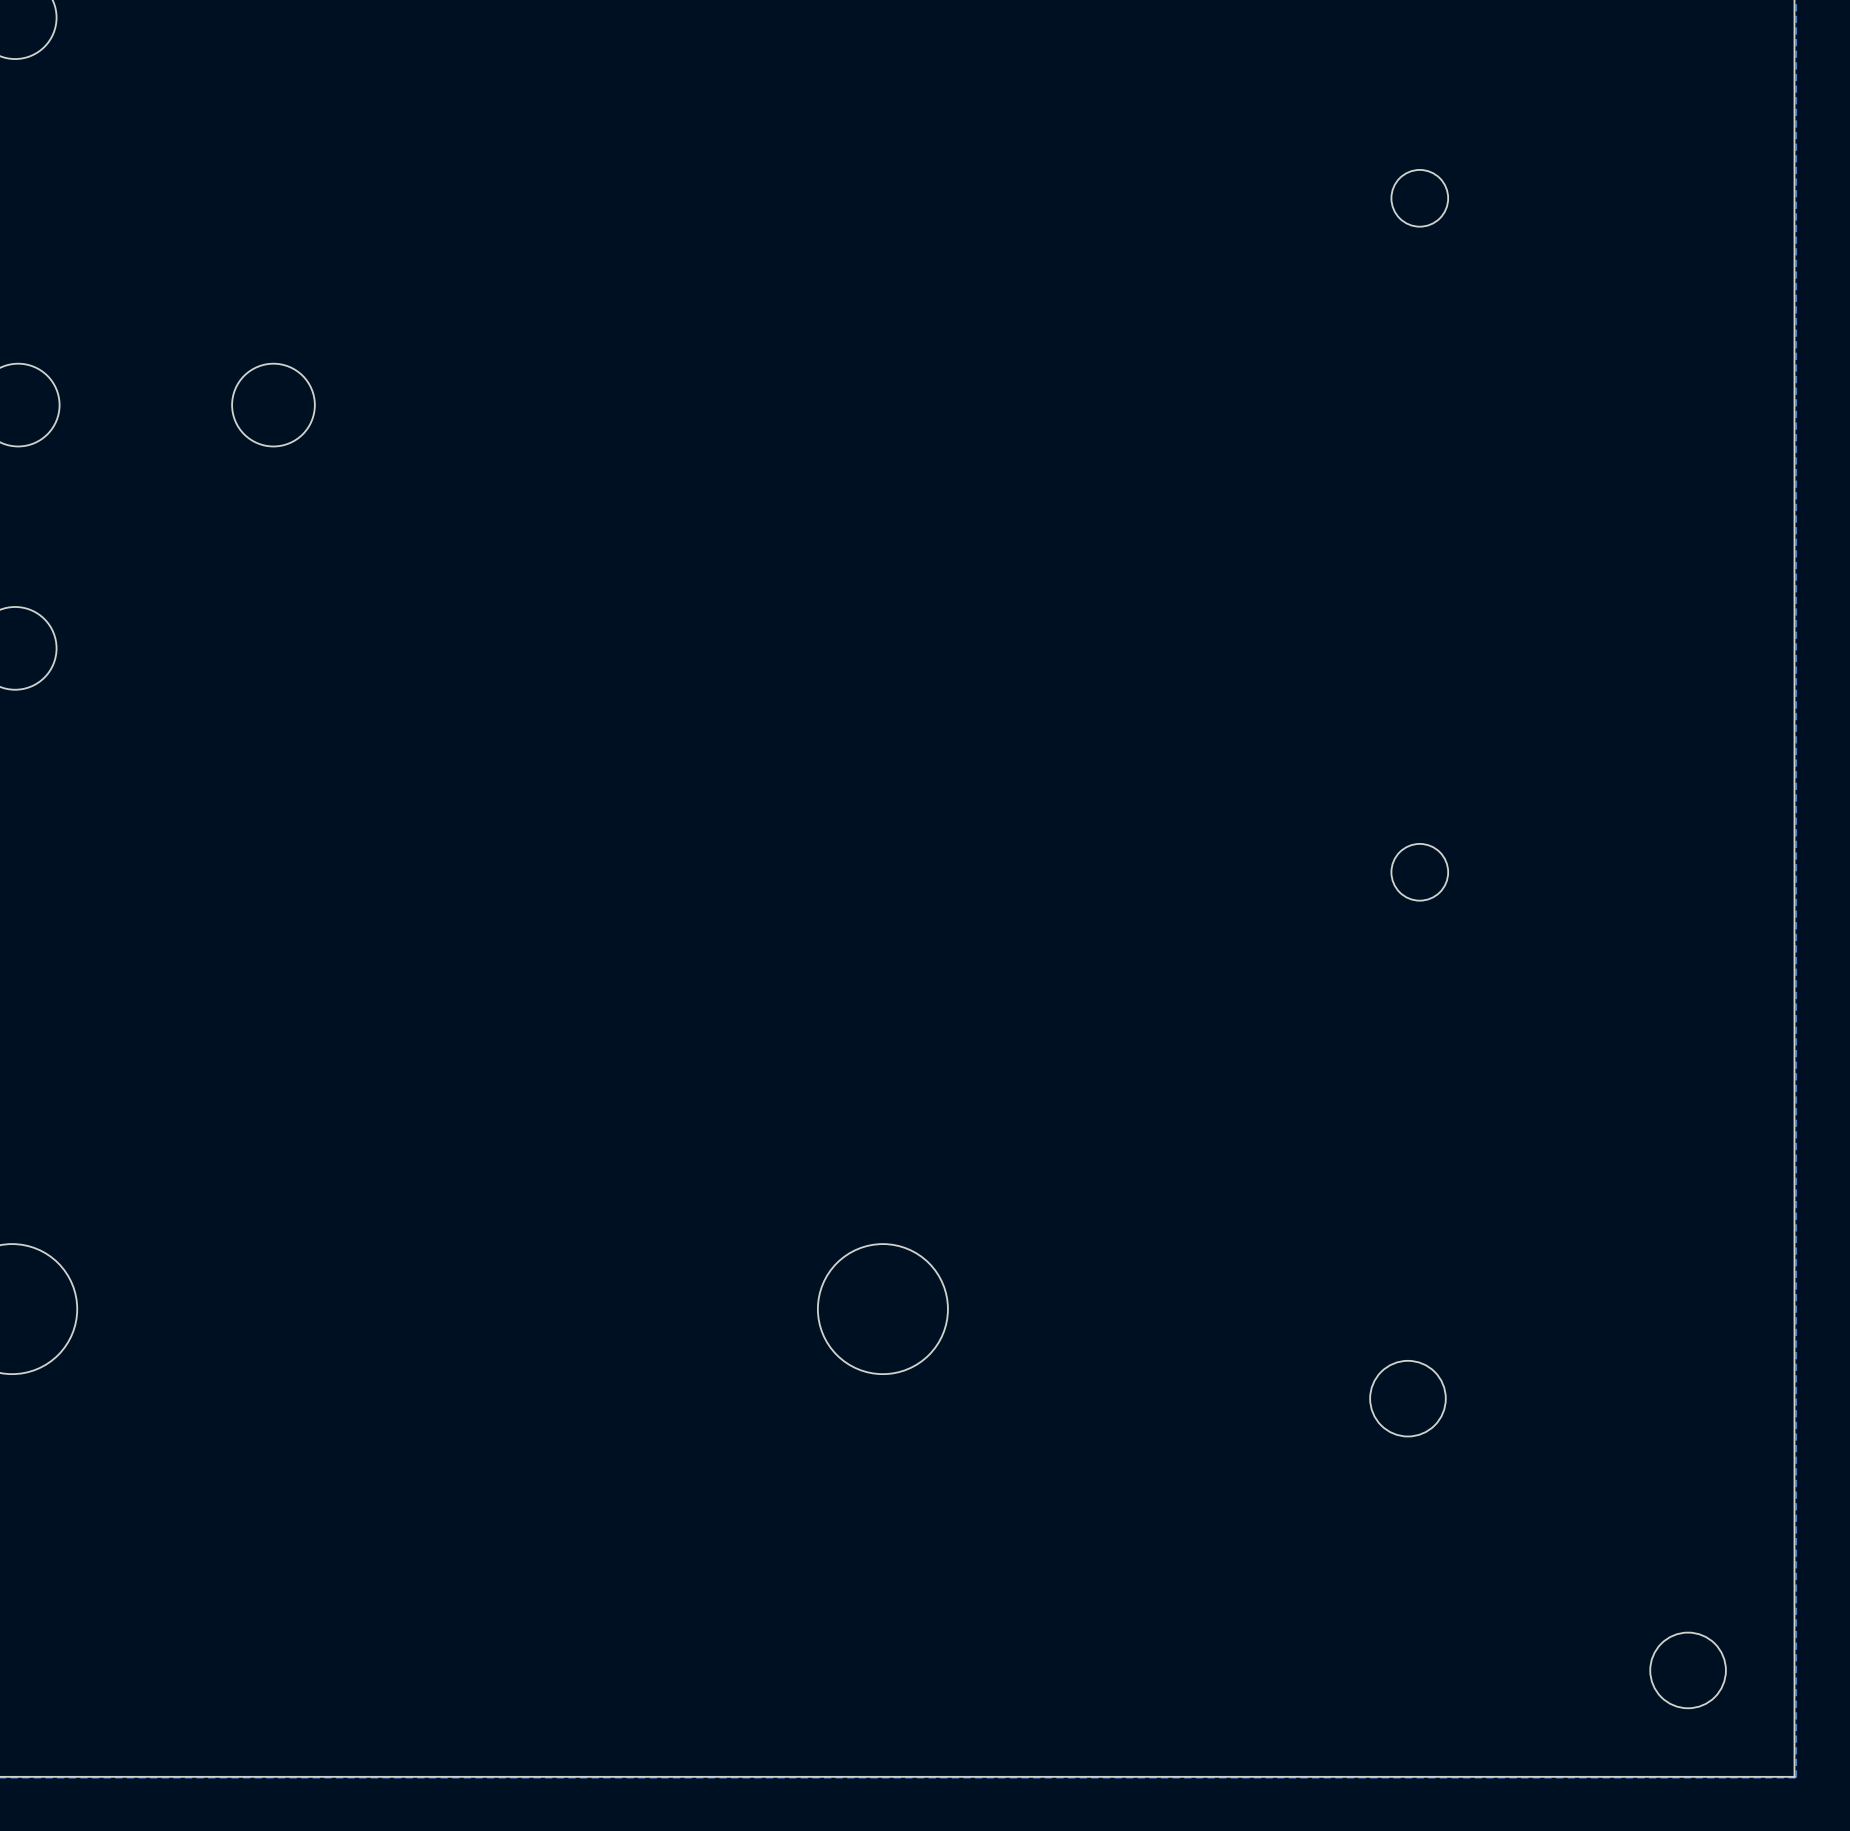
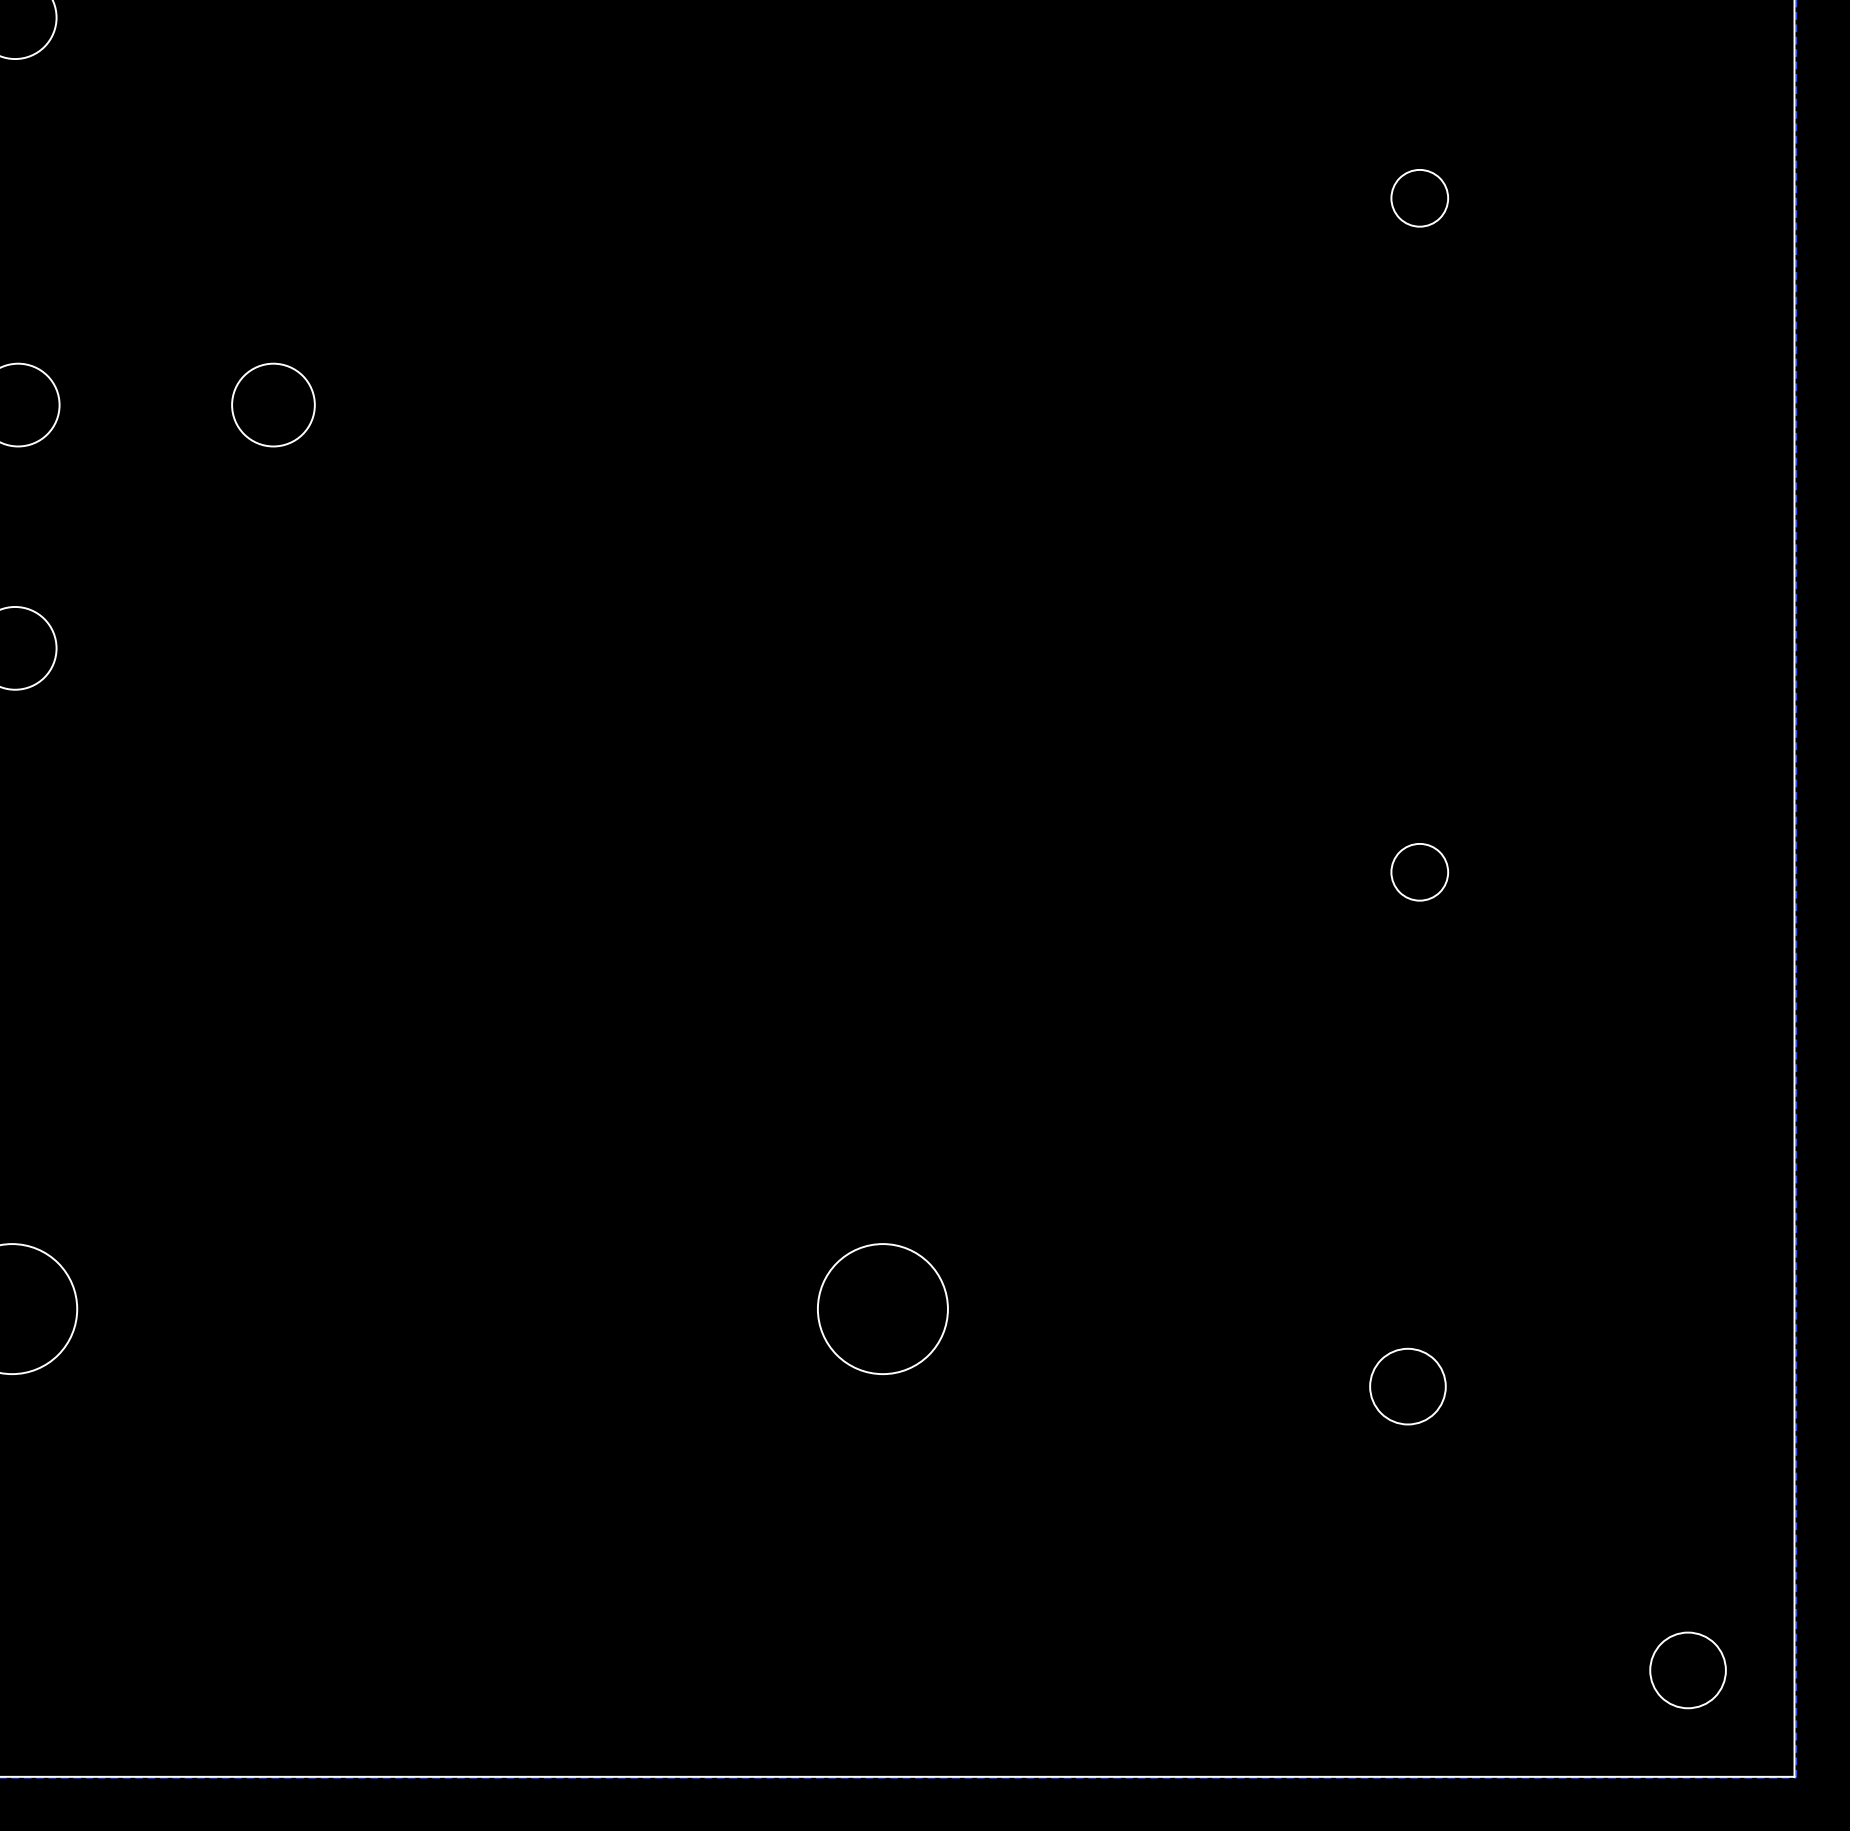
round board edge position: (1407, 1398) -> (1407, 1386)

